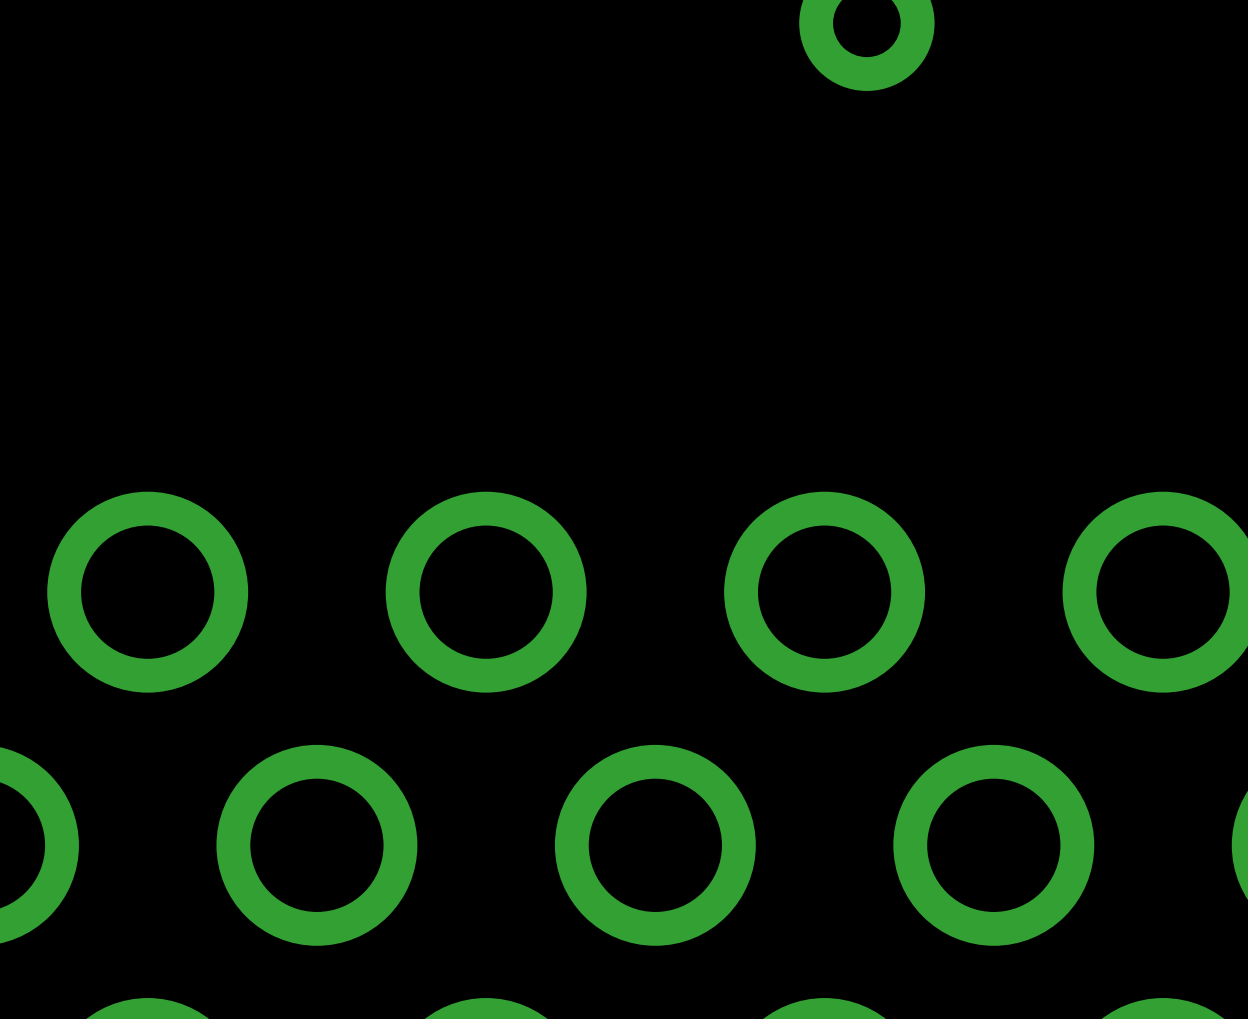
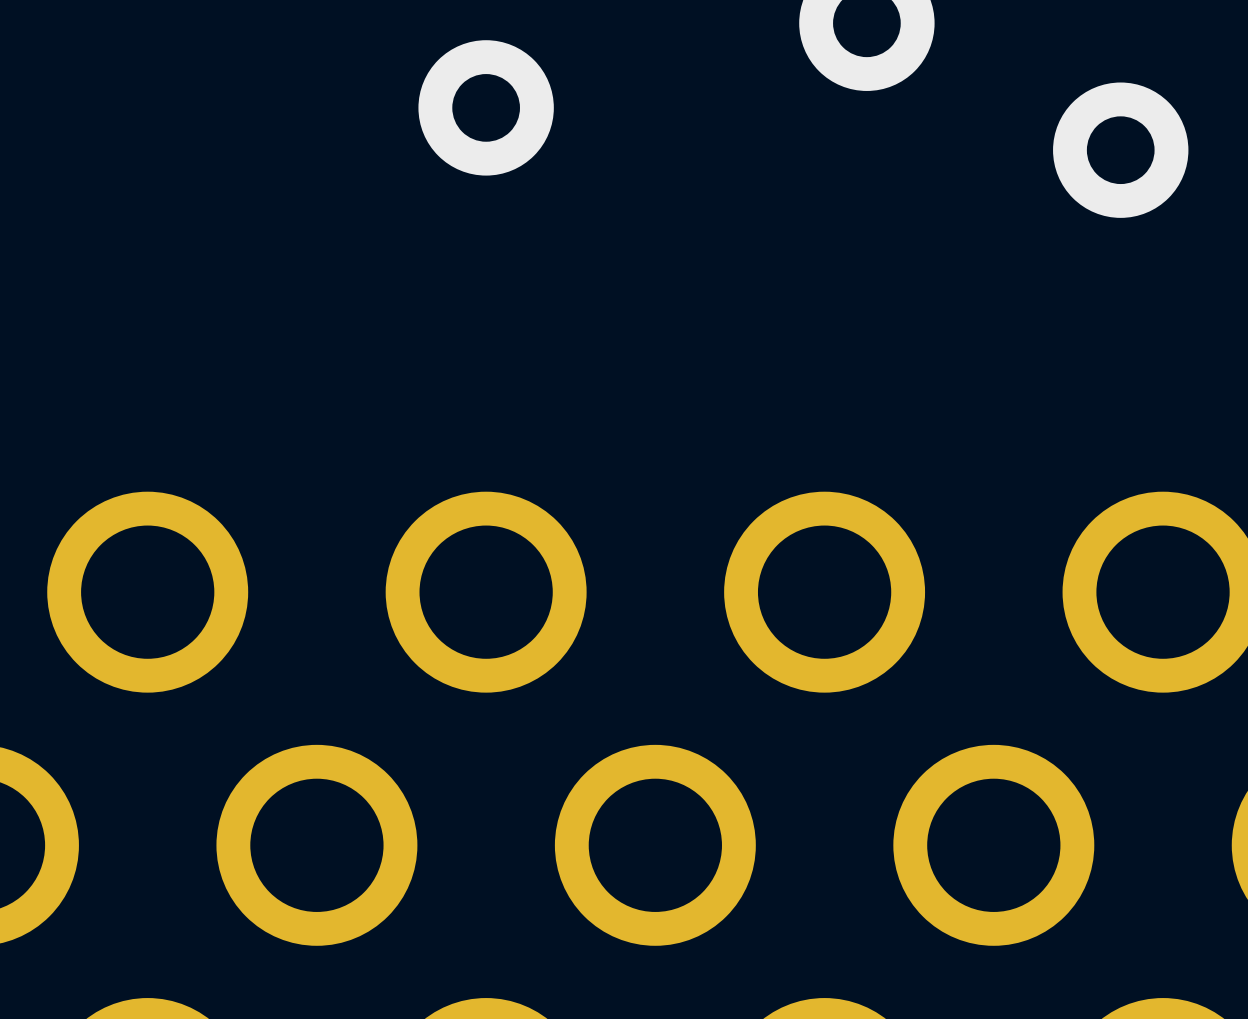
via: none -> (486, 107)
via: none -> (1120, 150)

